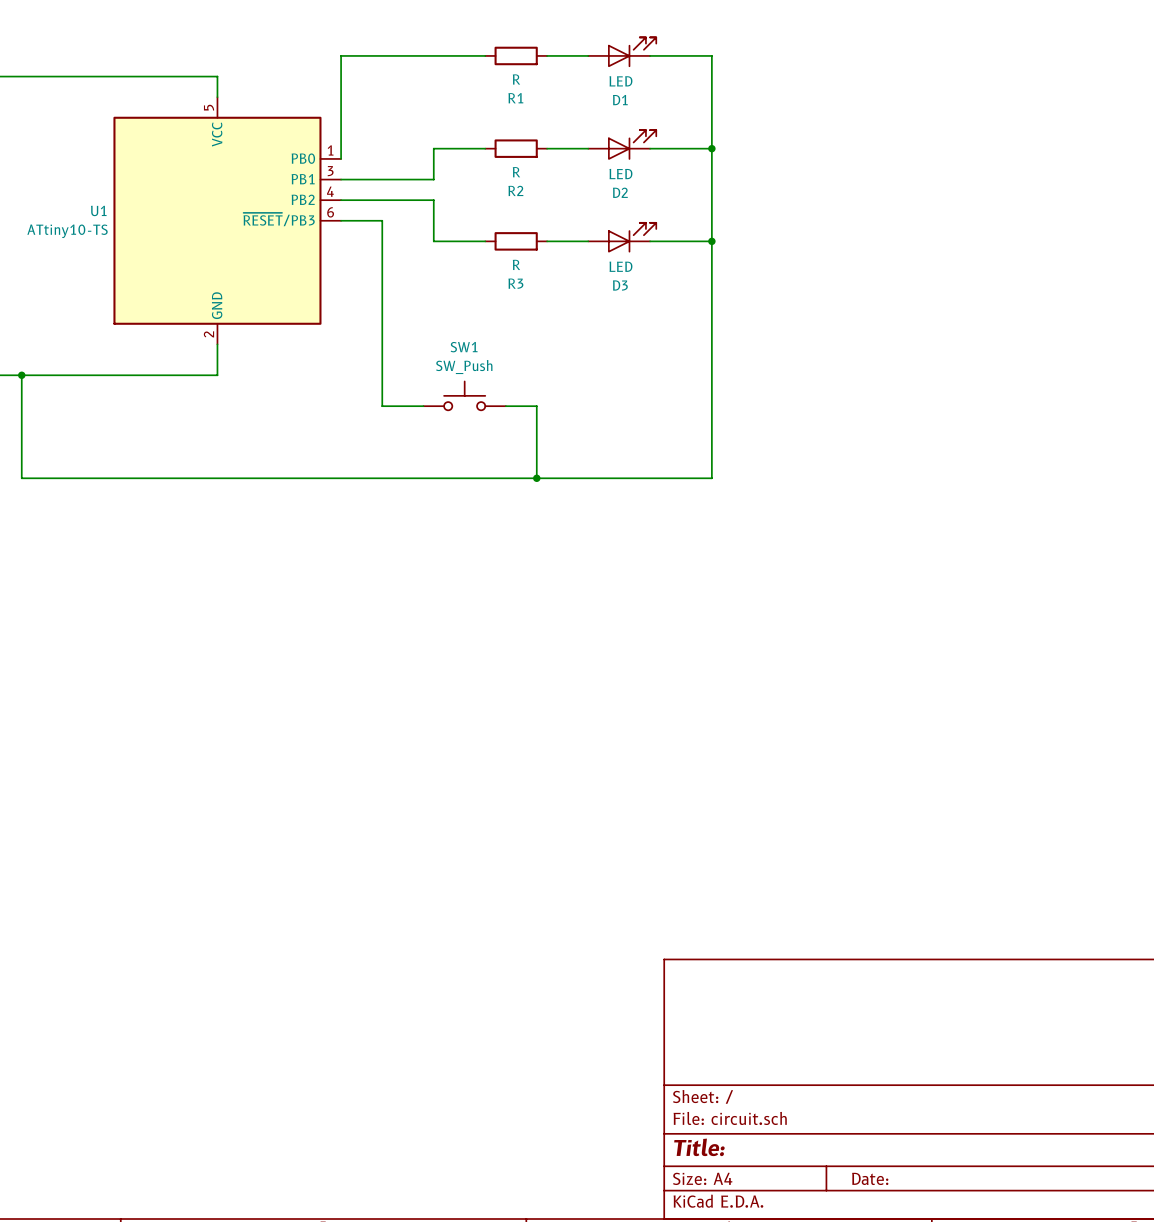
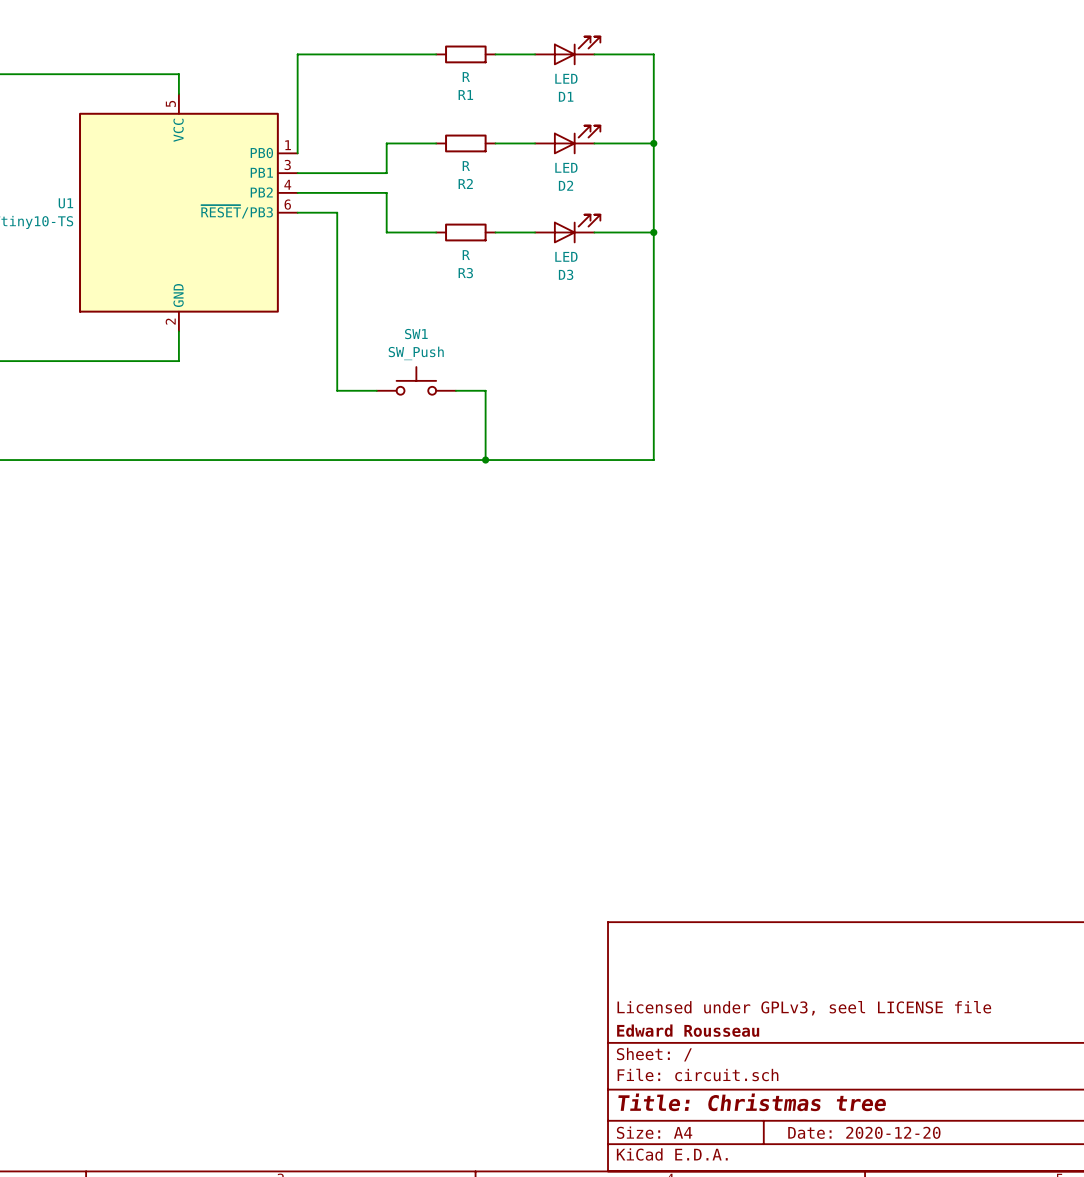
title block: none -> Licensed under GPLv3, seel LICENSE file (804, 1008)
title block: none -> Edward Rousseau (688, 1030)
title block: Title: (699, 1147) -> Title: Christmas tree (752, 1102)
title block: Date: (870, 1178) -> Date: 2020-12-20 (864, 1132)

